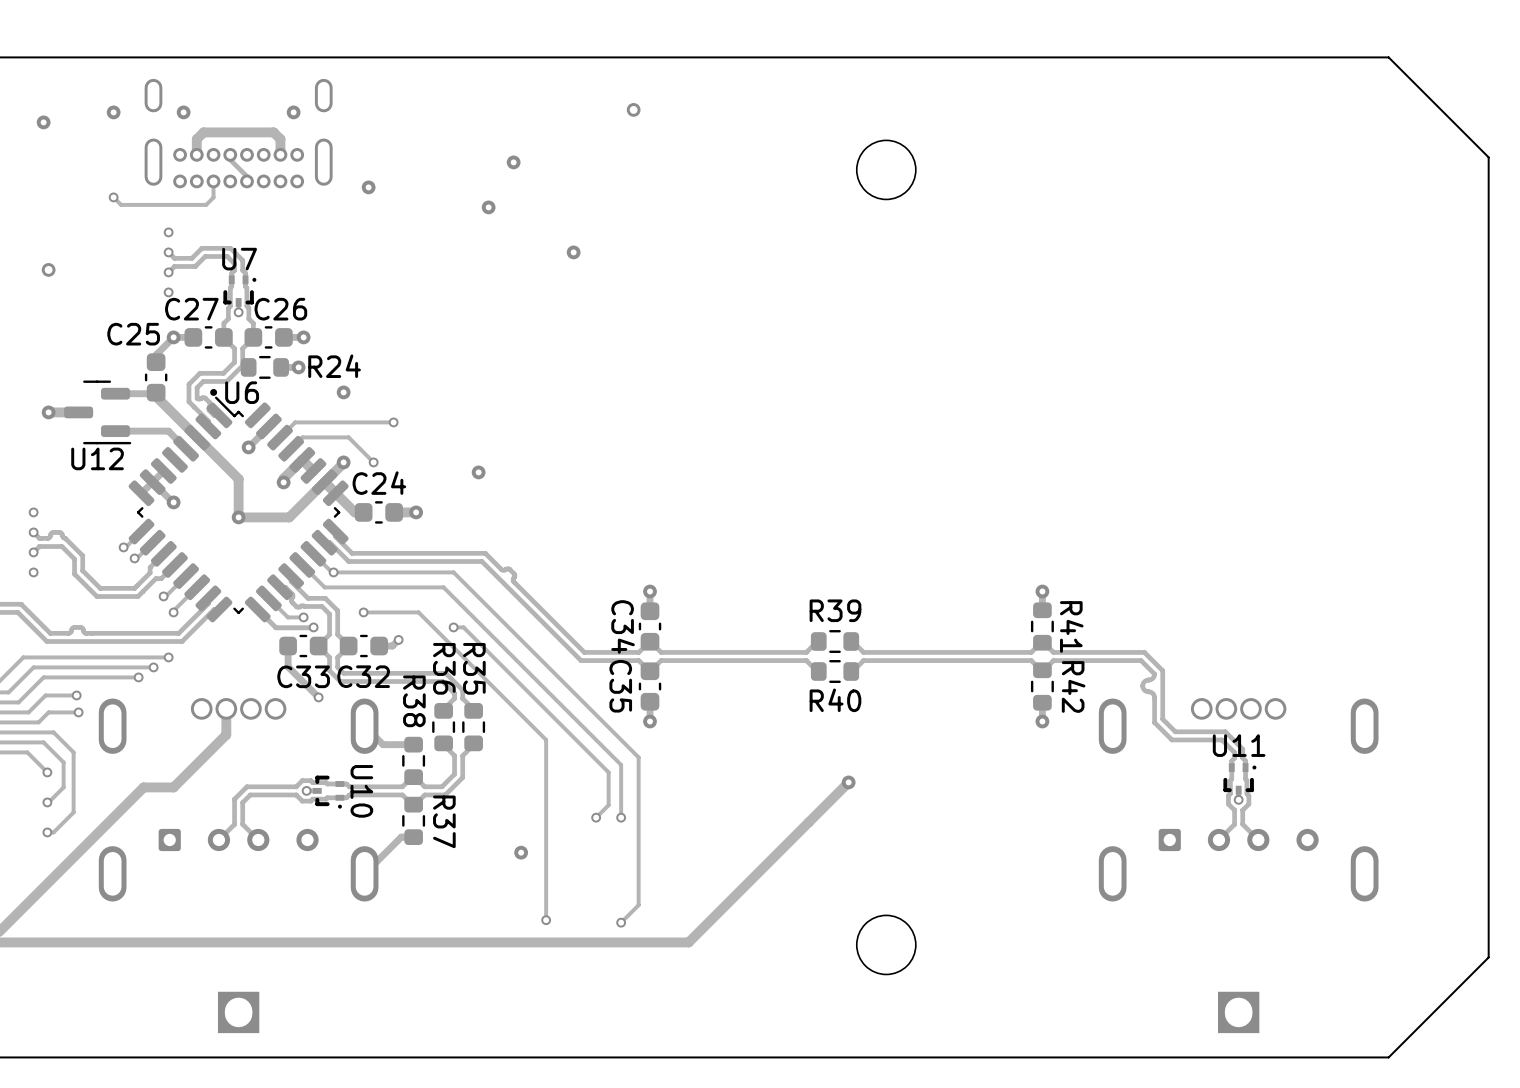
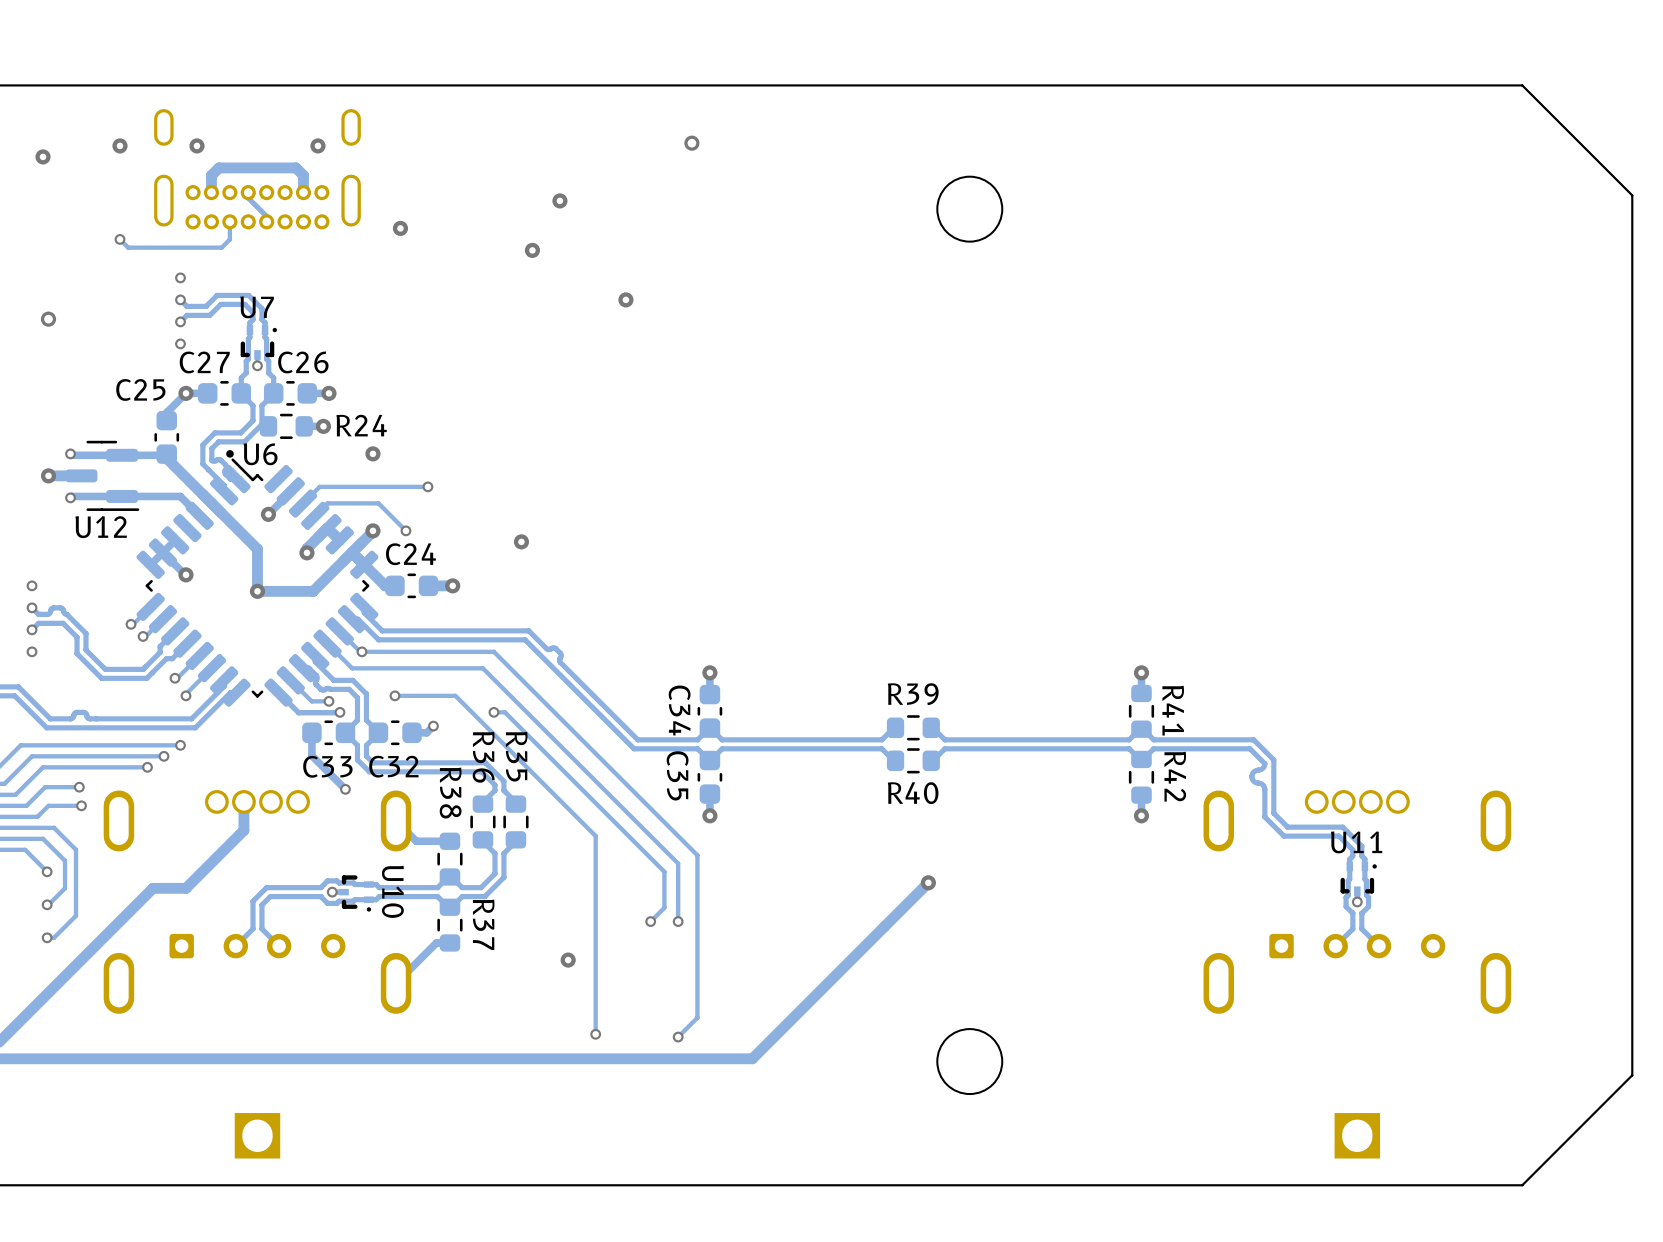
track: none -> (70, 453) (122, 455)
via: none -> (70, 453)
track: none -> (122, 496) (70, 497)
via: none -> (70, 497)

